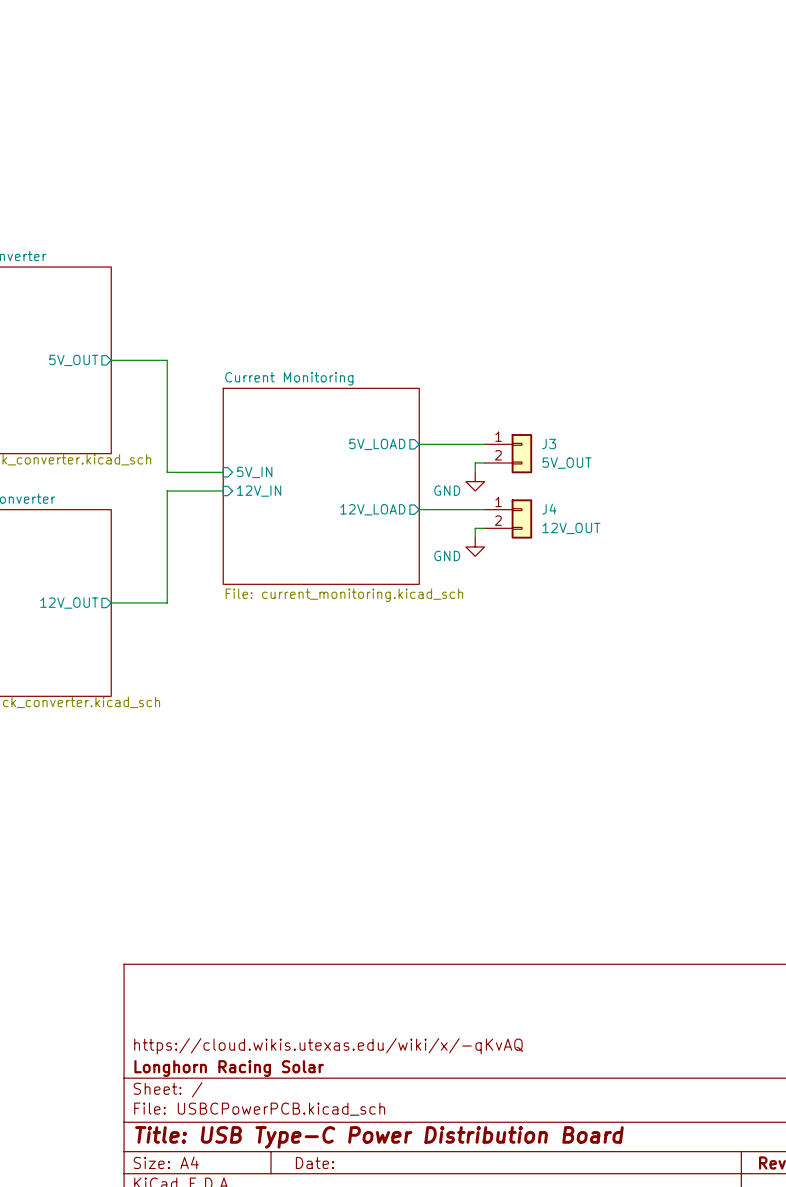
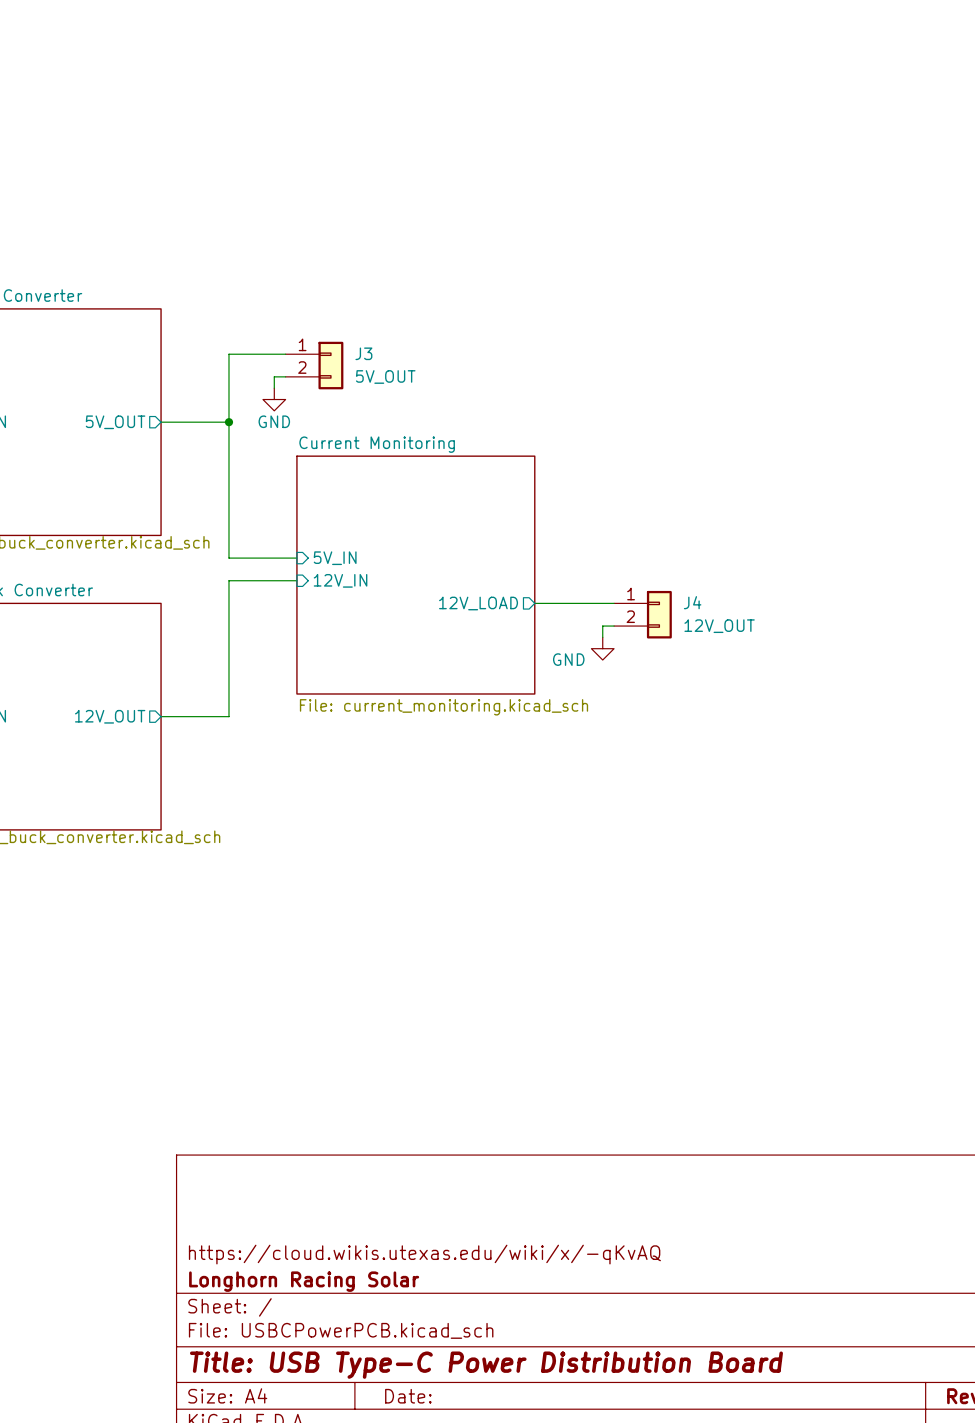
wire: none -> (285, 354) (228, 354) (228, 422)
wire: none -> (285, 376) (274, 376) (274, 388)
power symbol: none -> GND (274, 399)
junction: none -> (228, 422)
sheet pin: 5V_LOAD (377, 444) -> none
wire: (419, 444) (484, 444) -> none
J3 position: (508, 453) -> (314, 365)
wire: (484, 462) (475, 462) (475, 472) -> none
power symbol: GND (475, 481) -> none

